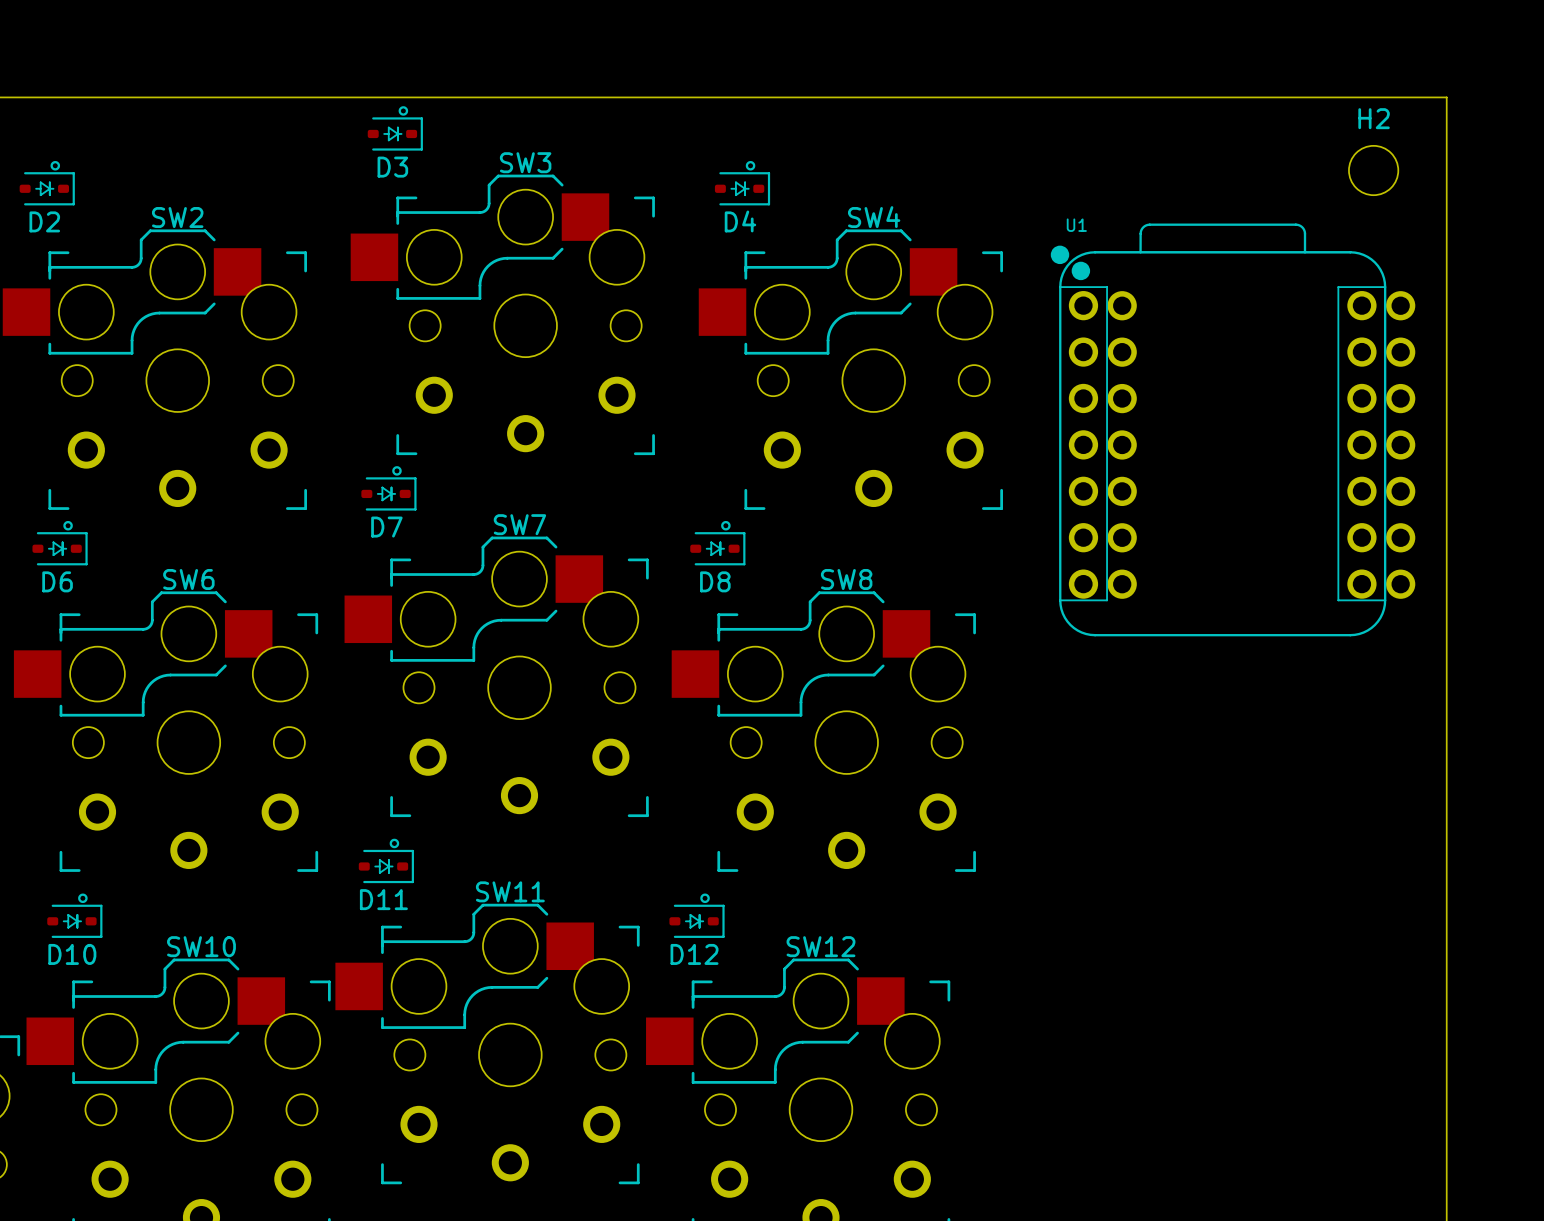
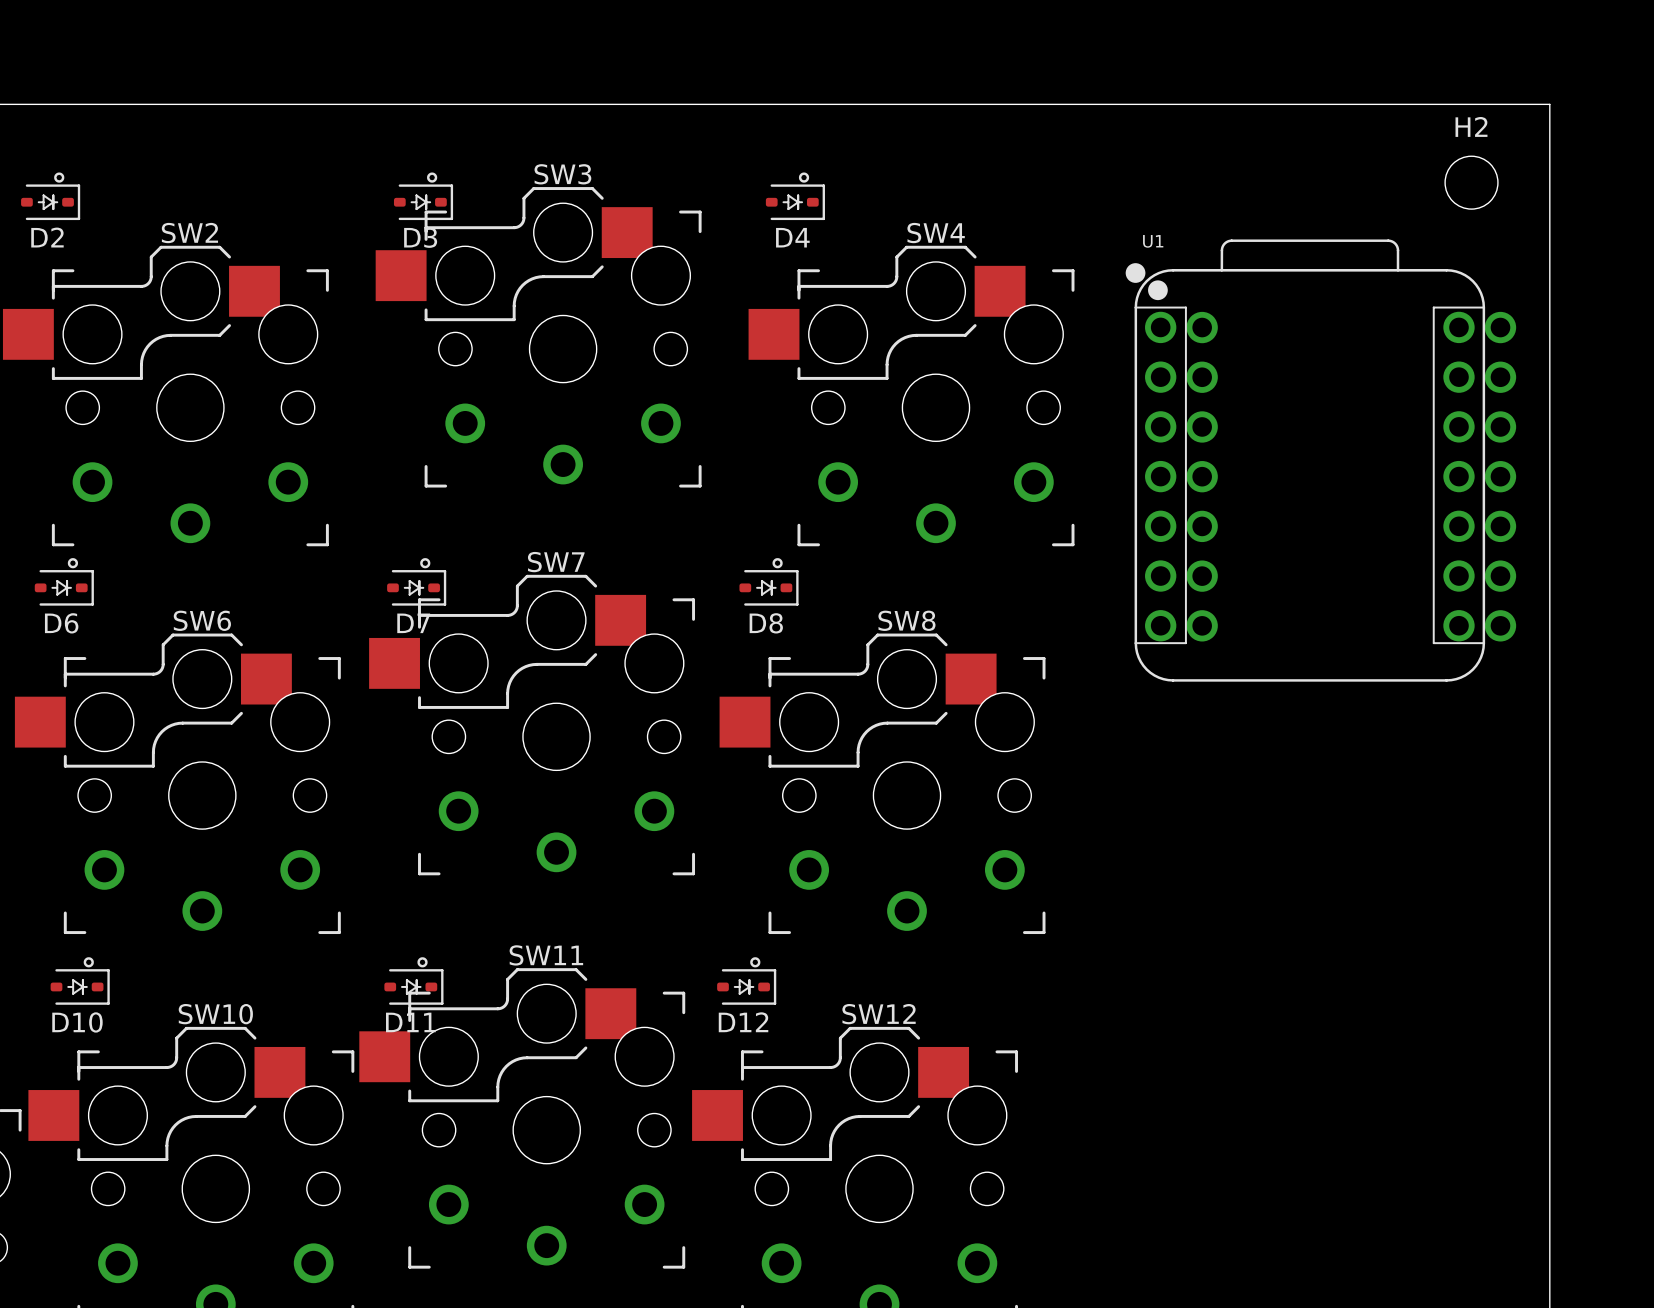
D3 position: (395, 128) -> (423, 196)
D7 position: (388, 488) -> (416, 581)
D11 position: (386, 860) -> (413, 980)

